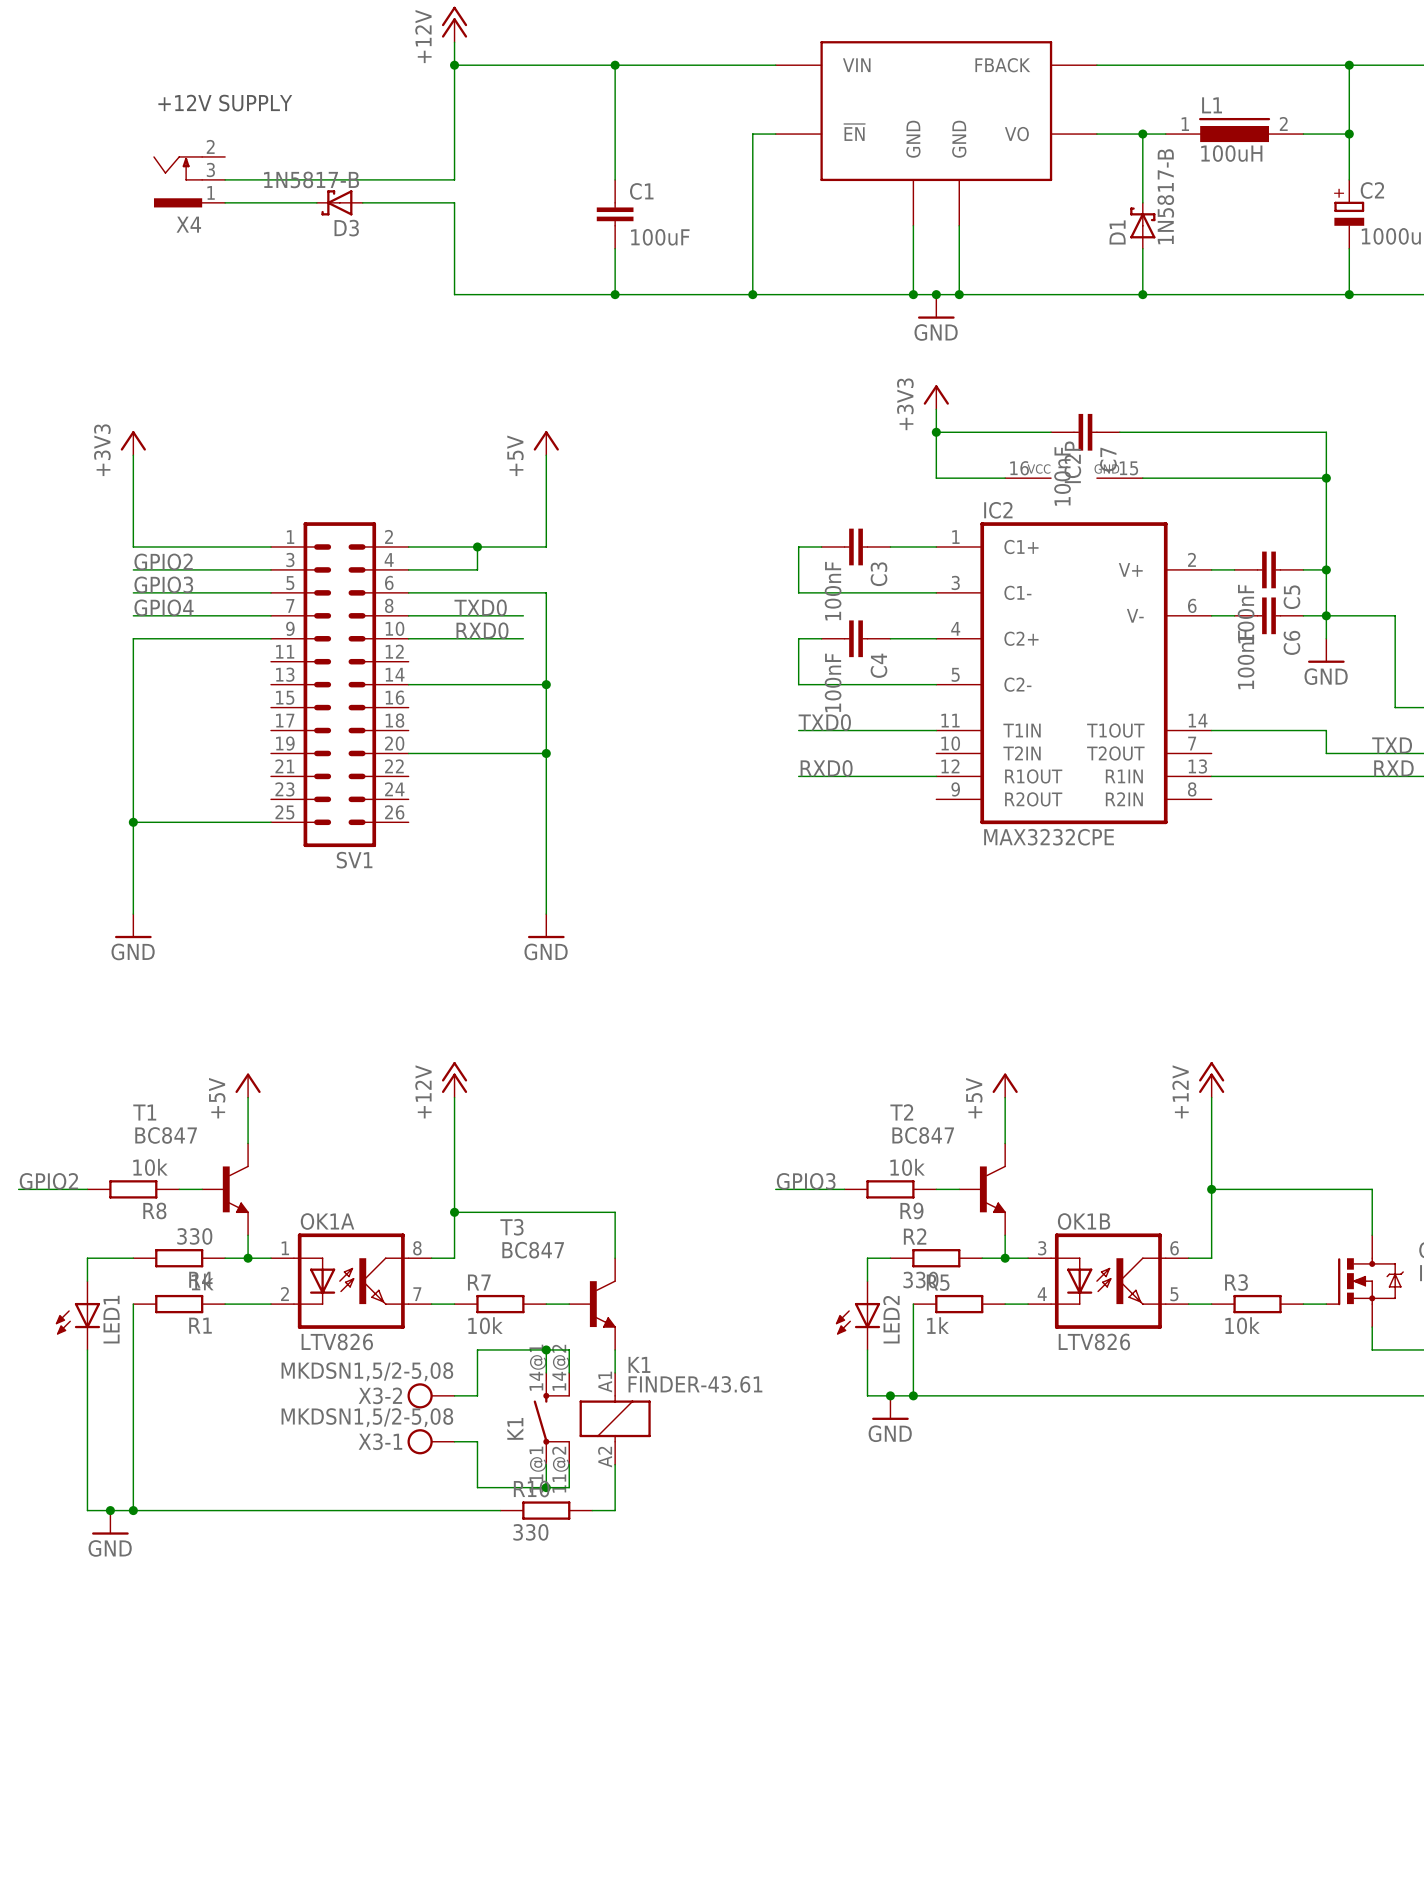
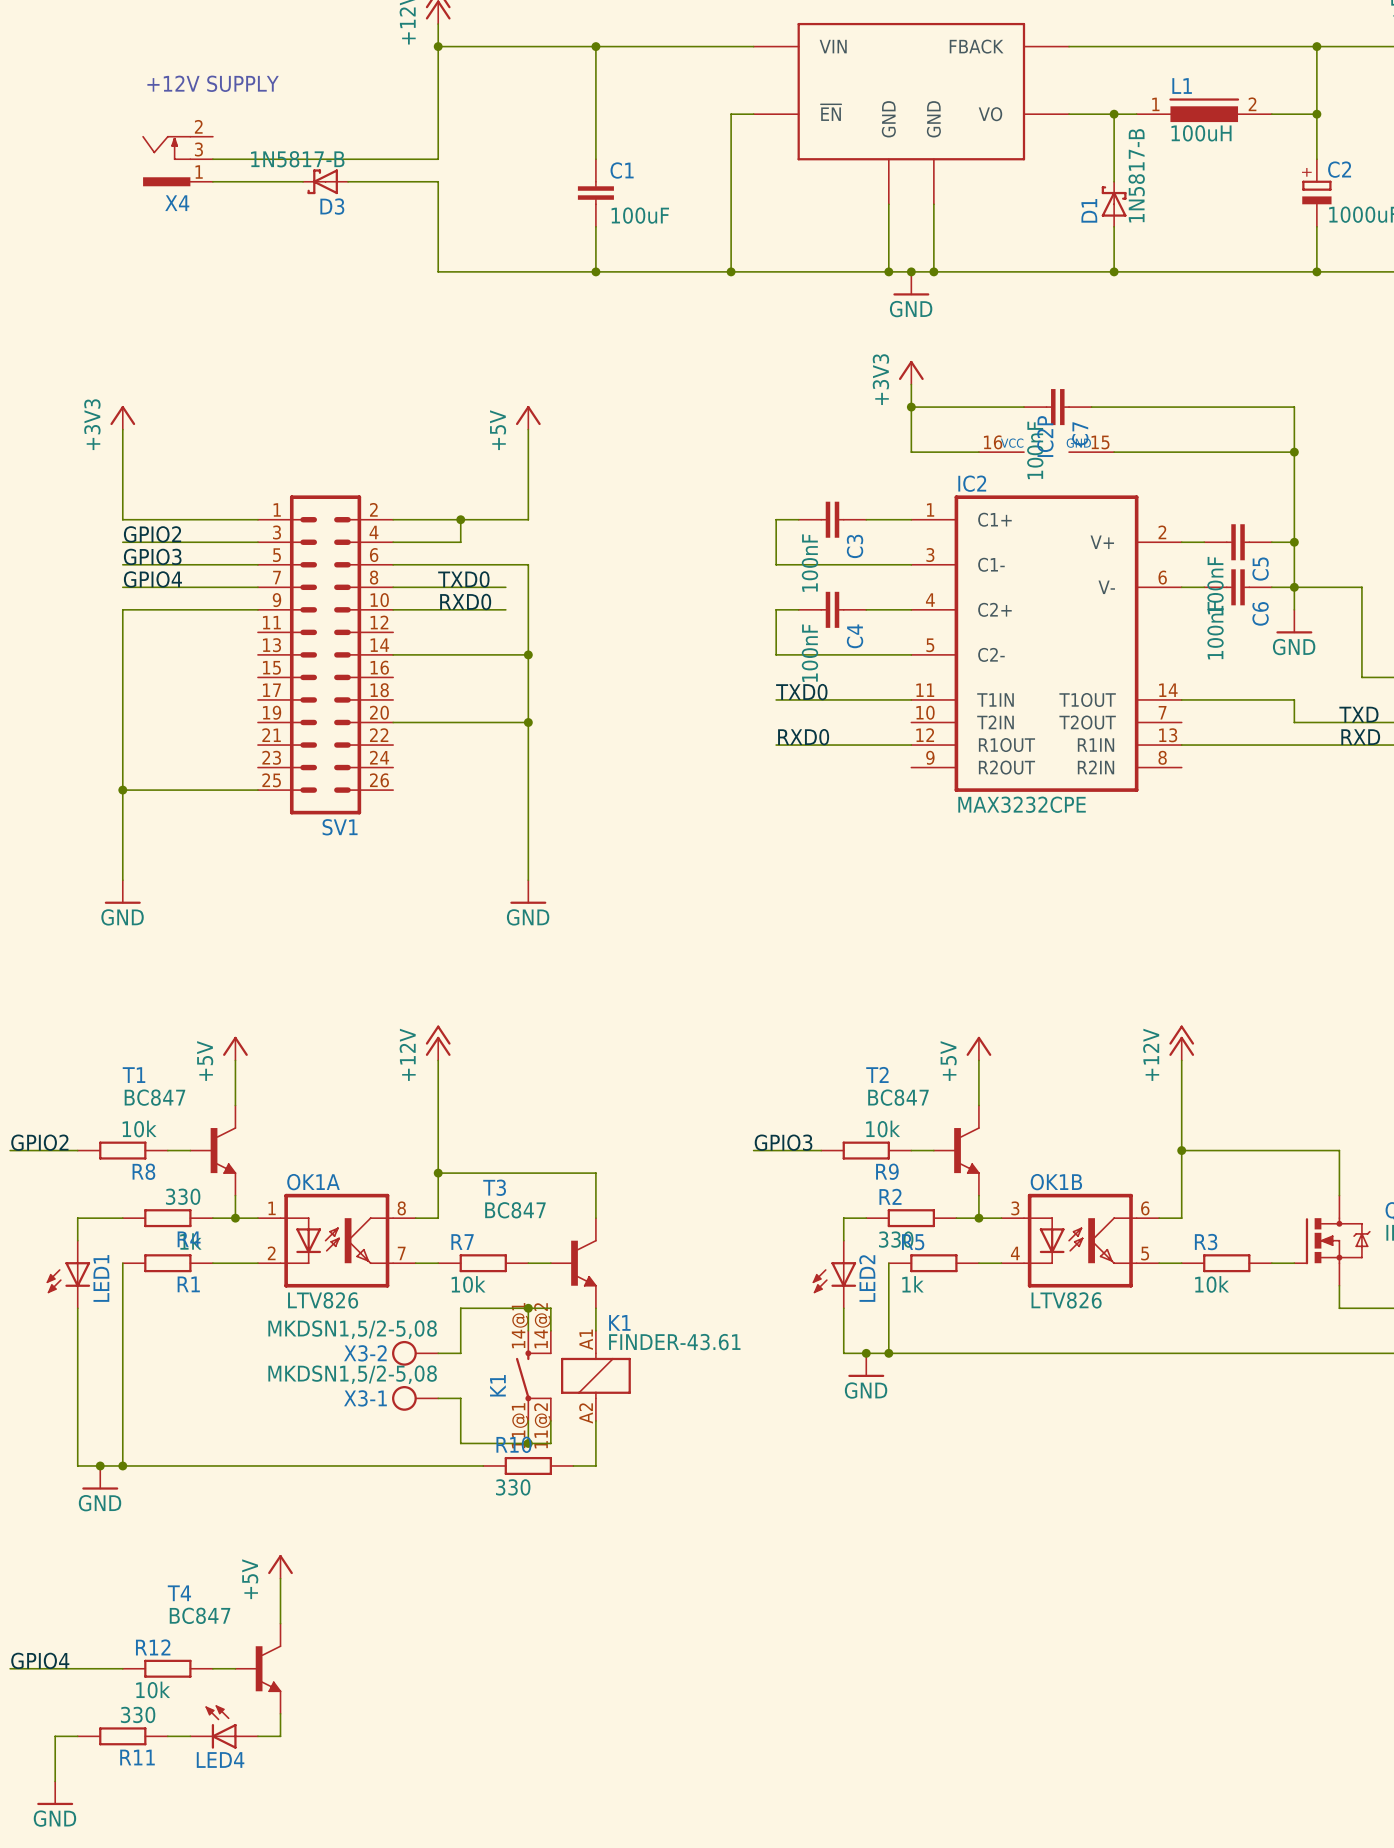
power symbol: none -> +5V (280, 1566)
wire: none -> (280, 1578) (280, 1623)
label: none -> GPIO4 (40, 1660)
wire: none -> (10, 1668) (122, 1668)
R12: none -> 10k (167, 1668)
wire: none -> (212, 1668) (235, 1668)
T4: none -> BC847 (258, 1668)
wire: none -> (280, 1713) (280, 1736) (257, 1736)
LED4: none -> (224, 1727)
wire: none -> (77, 1736) (55, 1736) (55, 1781)
R11: none -> 330 (122, 1736)
wire: none -> (167, 1736) (190, 1736)
power symbol: none -> GND (55, 1793)

